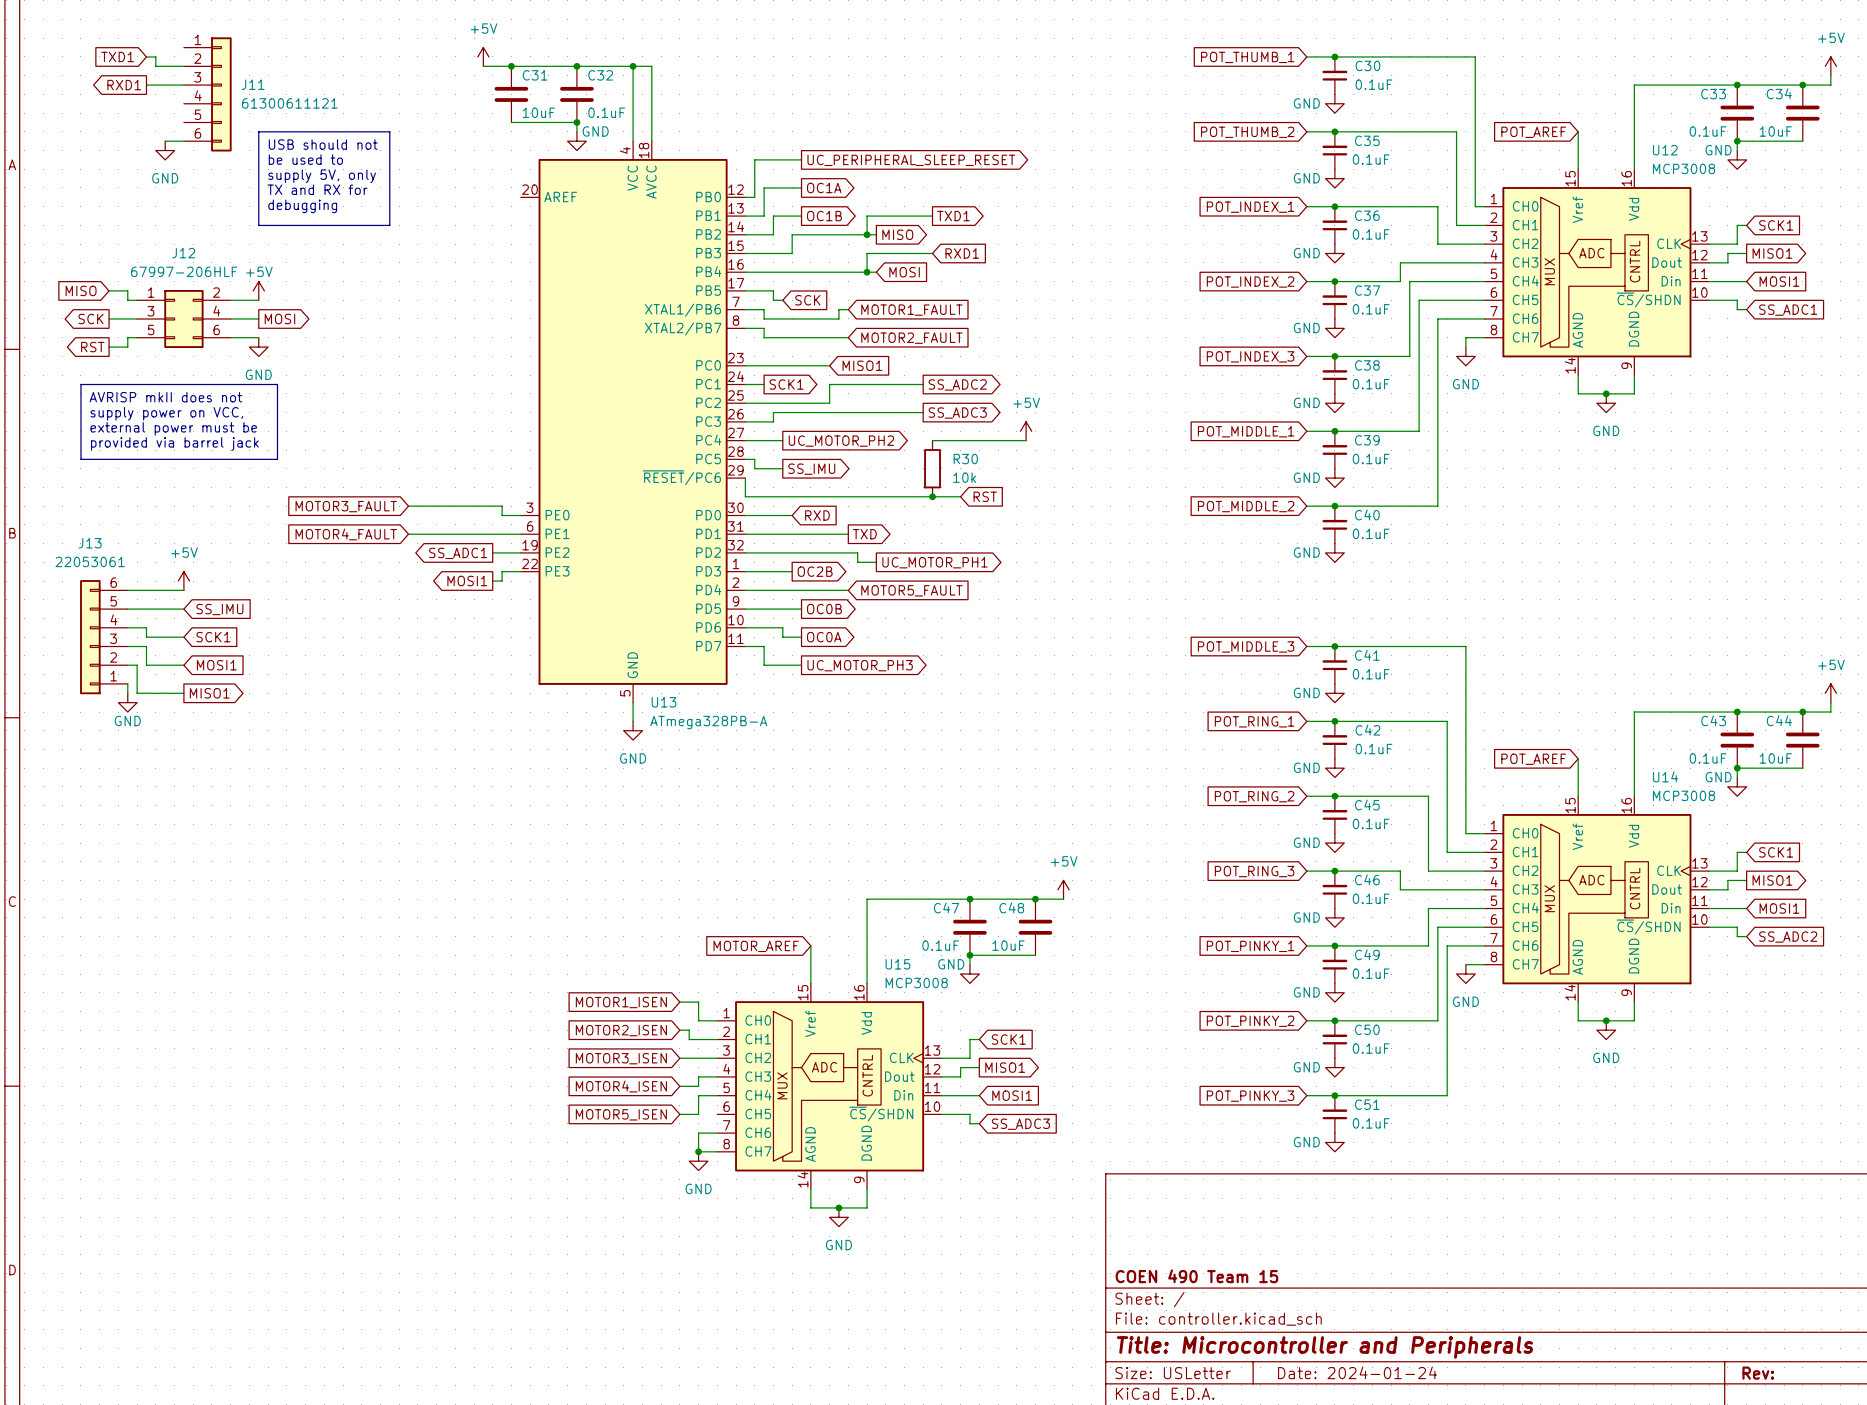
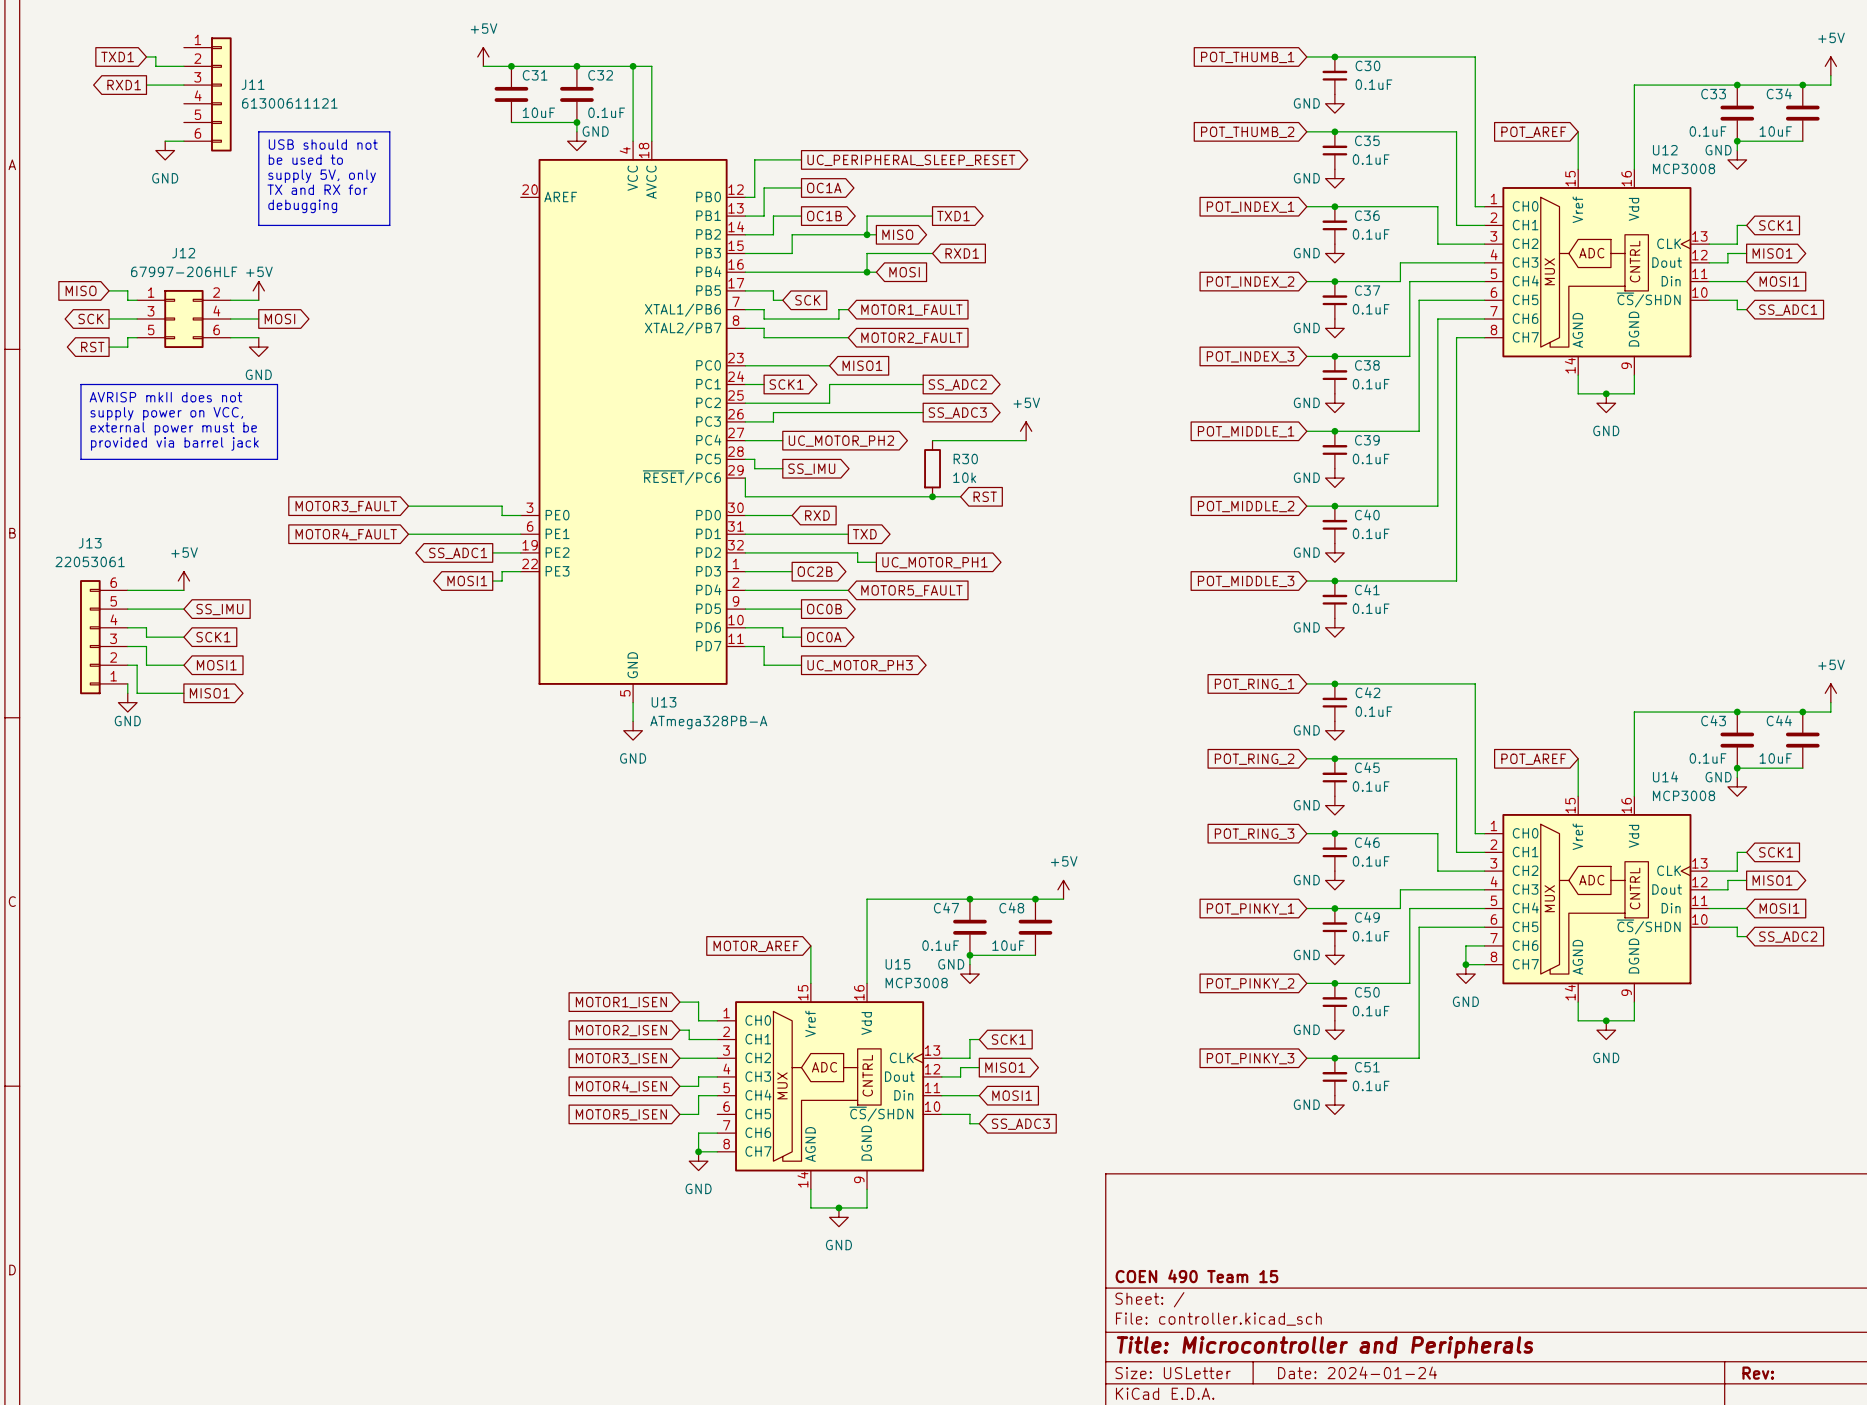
wire: (1465, 337) (1465, 347) -> (1465, 337) (1456, 337) (1456, 581) (1306, 581)
power symbol: GND (1465, 356) -> none
junction: none -> (1334, 581)
power symbol: none -> GND (1334, 627)
global label position: POT_MIDDLE_3 (1246, 646) -> POT_MIDDLE_3 (1246, 581)
wire: (1306, 646) (1465, 646) (1465, 833) (1475, 833) -> (1306, 683) (1475, 683) (1475, 833)
junction: (1334, 646) -> none
C41 position: (1334, 665) -> (1334, 599)
junction: none -> (1334, 683)
power symbol: GND (1334, 693) -> none
global label position: POT_RING_1 (1254, 721) -> POT_RING_1 (1254, 684)
wire: (1306, 721) (1447, 721) (1447, 852) (1456, 852) -> (1306, 758) (1456, 758) (1456, 852)
junction: (1334, 721) -> none
power symbol: none -> GND (1334, 730)
C42 position: (1334, 740) -> (1334, 702)
junction: none -> (1334, 758)
power symbol: GND (1334, 768) -> none
global label position: POT_RING_2 (1254, 796) -> POT_RING_2 (1254, 759)
wire: (1306, 796) (1428, 796) (1428, 871) (1437, 871) -> (1306, 833) (1437, 833) (1437, 871)
junction: (1334, 796) -> none
power symbol: none -> GND (1334, 805)
C45 position: (1334, 814) -> (1334, 777)
junction: none -> (1334, 833)
power symbol: GND (1334, 843) -> none
global label position: POT_RING_3 (1254, 871) -> POT_RING_3 (1254, 834)
wire: (1306, 871) (1400, 871) (1400, 889) -> (1306, 908) (1400, 908) (1400, 889)
junction: (1334, 871) -> none
power symbol: none -> GND (1334, 880)
C46 position: (1334, 889) -> (1334, 852)
junction: none -> (1334, 908)
wire: (1428, 908) (1428, 945) (1306, 945) -> (1428, 908) (1409, 908) (1409, 983) (1306, 983)
power symbol: GND (1334, 917) -> none
wire: (1437, 927) (1437, 1020) (1306, 1020) -> (1437, 927) (1419, 927) (1419, 1058) (1306, 1058)
junction: (1334, 945) -> none
wire: (1465, 945) (1447, 945) (1447, 1095) (1306, 1095) -> (1465, 945) (1465, 964)
global label position: POT_PINKY_1 (1250, 946) -> POT_PINKY_1 (1250, 908)
power symbol: none -> GND (1334, 955)
C49 position: (1334, 964) -> (1334, 927)
junction: none -> (1465, 964)
junction: none -> (1334, 983)
power symbol: GND (1334, 992) -> none
junction: (1334, 1020) -> none
global label position: POT_PINKY_2 (1250, 1021) -> POT_PINKY_2 (1250, 983)
power symbol: none -> GND (1334, 1030)
C50 position: (1334, 1039) -> (1334, 1002)
junction: none -> (1334, 1058)
power symbol: GND (1334, 1067) -> none
junction: (1334, 1095) -> none
global label position: POT_PINKY_3 (1250, 1096) -> POT_PINKY_3 (1250, 1058)
power symbol: none -> GND (1334, 1105)
C51 position: (1334, 1114) -> (1334, 1076)
power symbol: GND (1334, 1142) -> none

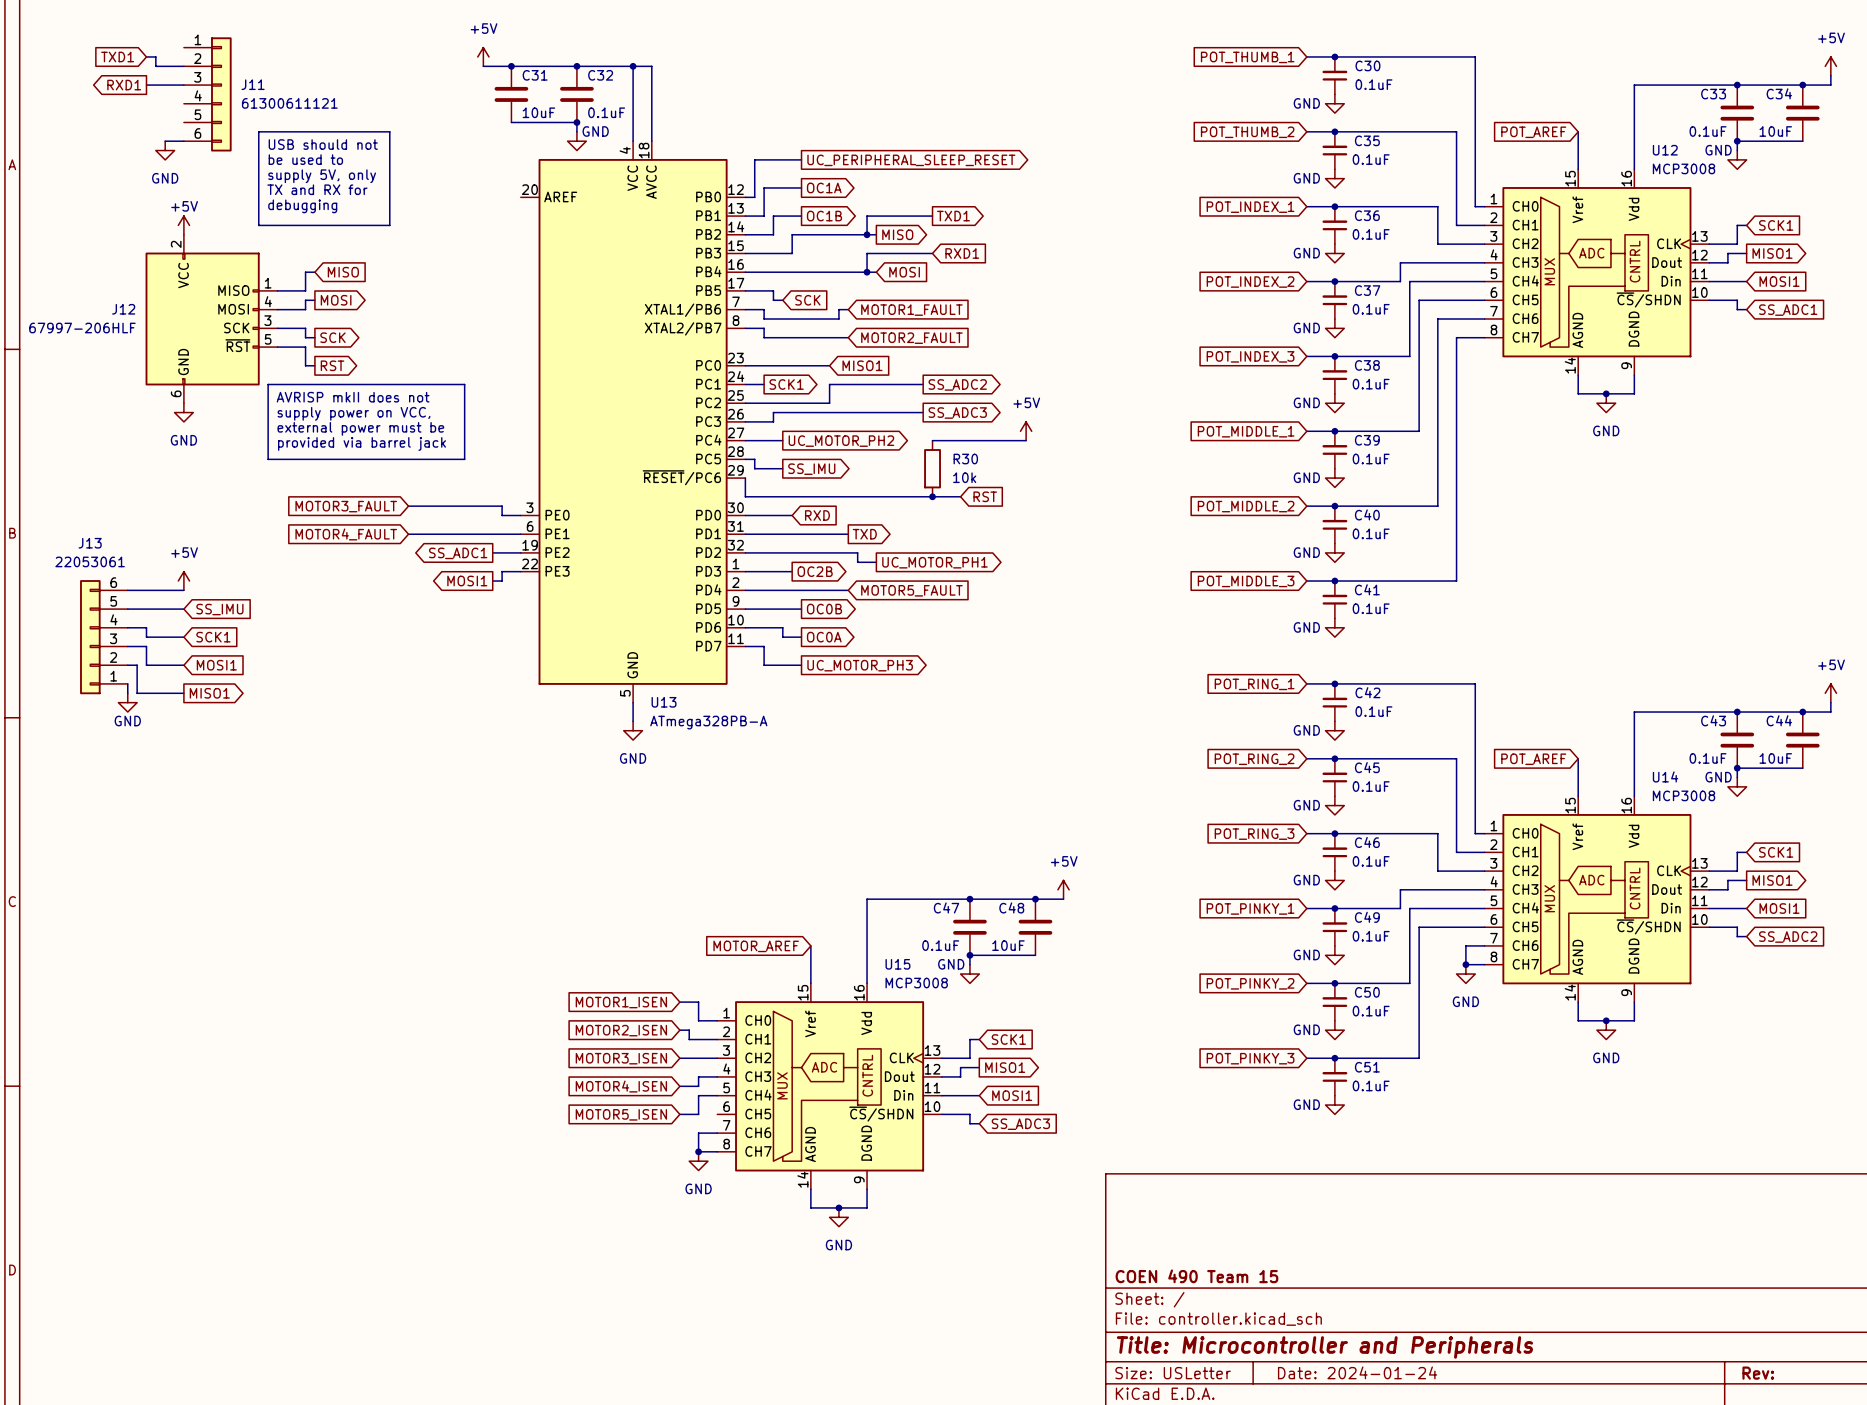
J12 name position: J12 (183, 253) -> J12 (123, 309)
J12 value position: 67997-206HLF (184, 271) -> 67997-206HLF (82, 328)
wire: none -> (314, 272) (305, 272) (305, 290) (277, 290)
global label: none -> MISO (343, 272)
J12 symbol: [137, 289, 231, 349] -> [145, 234, 278, 404]
global label: MISO (81, 290) -> none
wire: (109, 290) (127, 290) (127, 300) (137, 300) -> none
power symbol position: +5V (258, 290) -> +5V (183, 225)
wire: none -> (314, 300) (305, 300) (305, 309) (277, 309)
global label: SCK (90, 318) -> none
wire: (109, 318) (137, 318) -> none
global label position: MOSI (279, 318) -> MOSI (336, 300)
wire: none -> (277, 328) (305, 328) (305, 337) (314, 337)
wire: (137, 337) (127, 337) (127, 347) (109, 347) -> none
global label: none -> SCK (332, 337)
global label: RST (92, 347) -> none
power symbol position: GND (258, 347) -> GND (183, 412)
wire: none -> (277, 347) (305, 347) (305, 365) (314, 365)
global label: none -> RST (332, 365)
line: (268, 384) (80, 384) (80, 459) (268, 459) -> (268, 384) (268, 459)
line: (277, 384) (277, 459) -> (277, 384) (464, 384) (464, 459) (277, 459)
text: AVRISP mkII does not (165, 397) -> none
text: none -> AVRISP mkII does not (353, 397)
text: supply power on VCC, (166, 413) -> none
text: none -> supply power on VCC, (353, 413)
text: external power must be (173, 428) -> none
text: none -> external power must be (360, 428)
text: provided via barrel jack (174, 443) -> none
text: none -> provided via barrel jack (362, 443)

